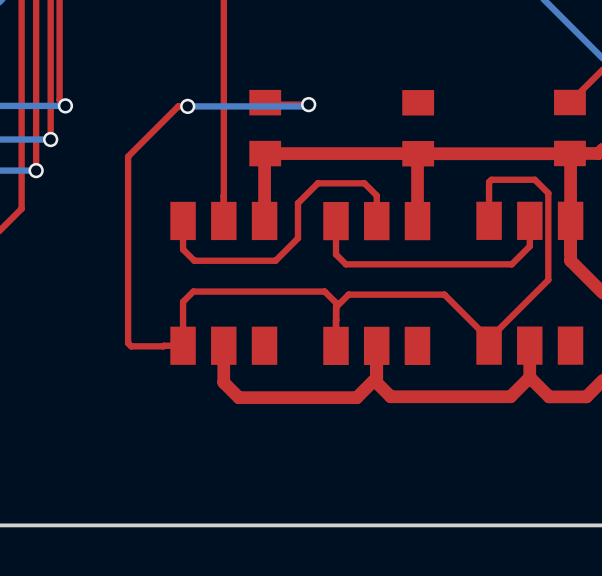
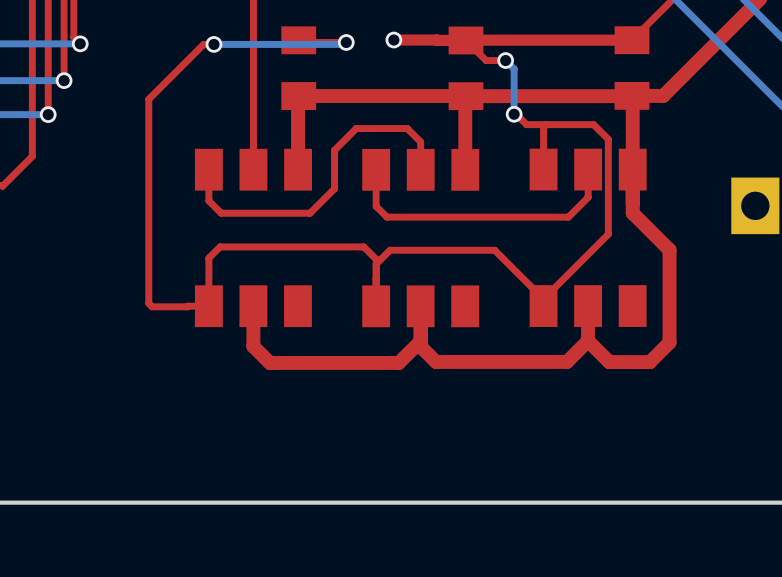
top track: none -> (393, 40) (466, 40)
via: none -> (393, 40)
top track: none -> (466, 40) (486, 60) (505, 60)
top track: none -> (632, 40) (466, 40)
bottom track: none -> (505, 60) (514, 69) (514, 114)
via: none -> (505, 60)
top track: none -> (514, 114) (526, 124) (546, 124)
via: none -> (514, 114)

